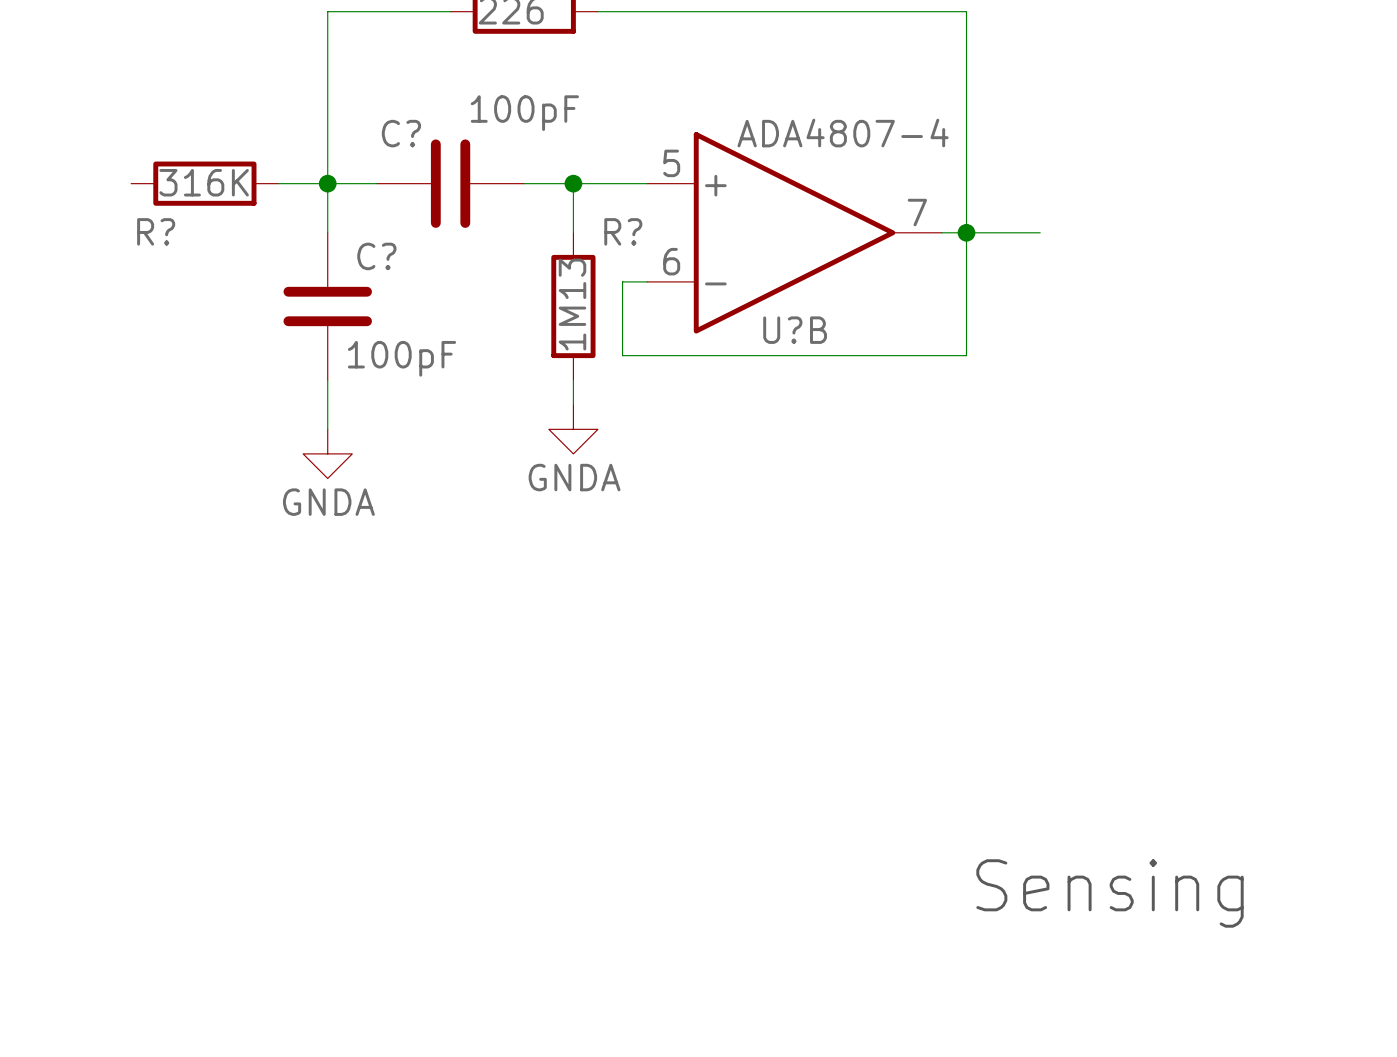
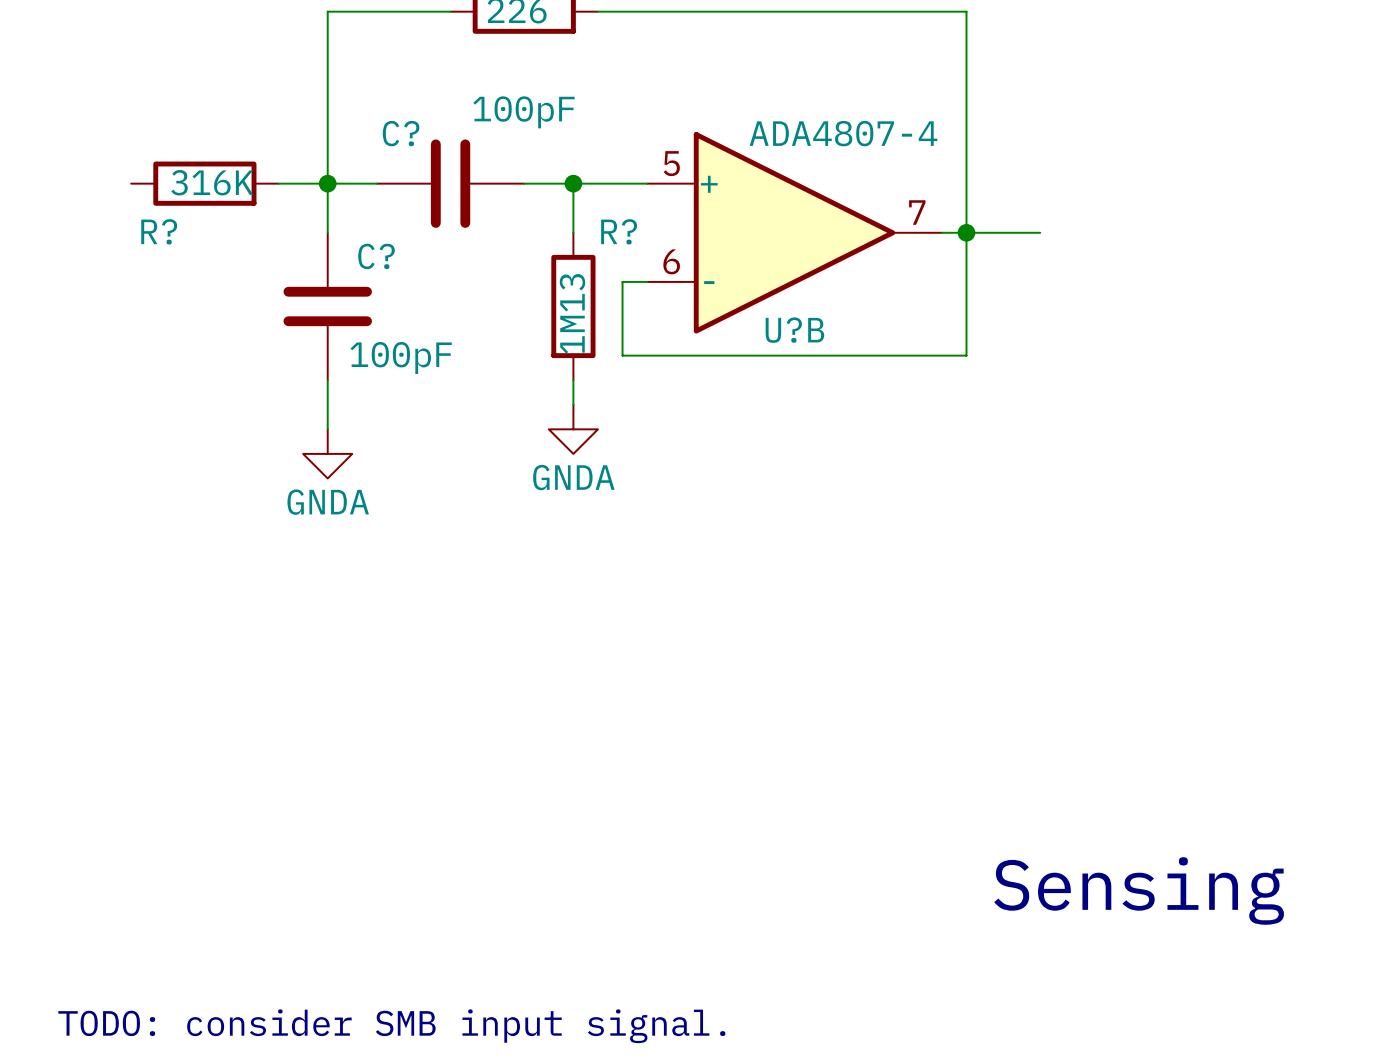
text position: Sensing (1109, 893) -> Sensing (1139, 890)
text: none -> TODO: consider SMB input signal. (391, 1026)

